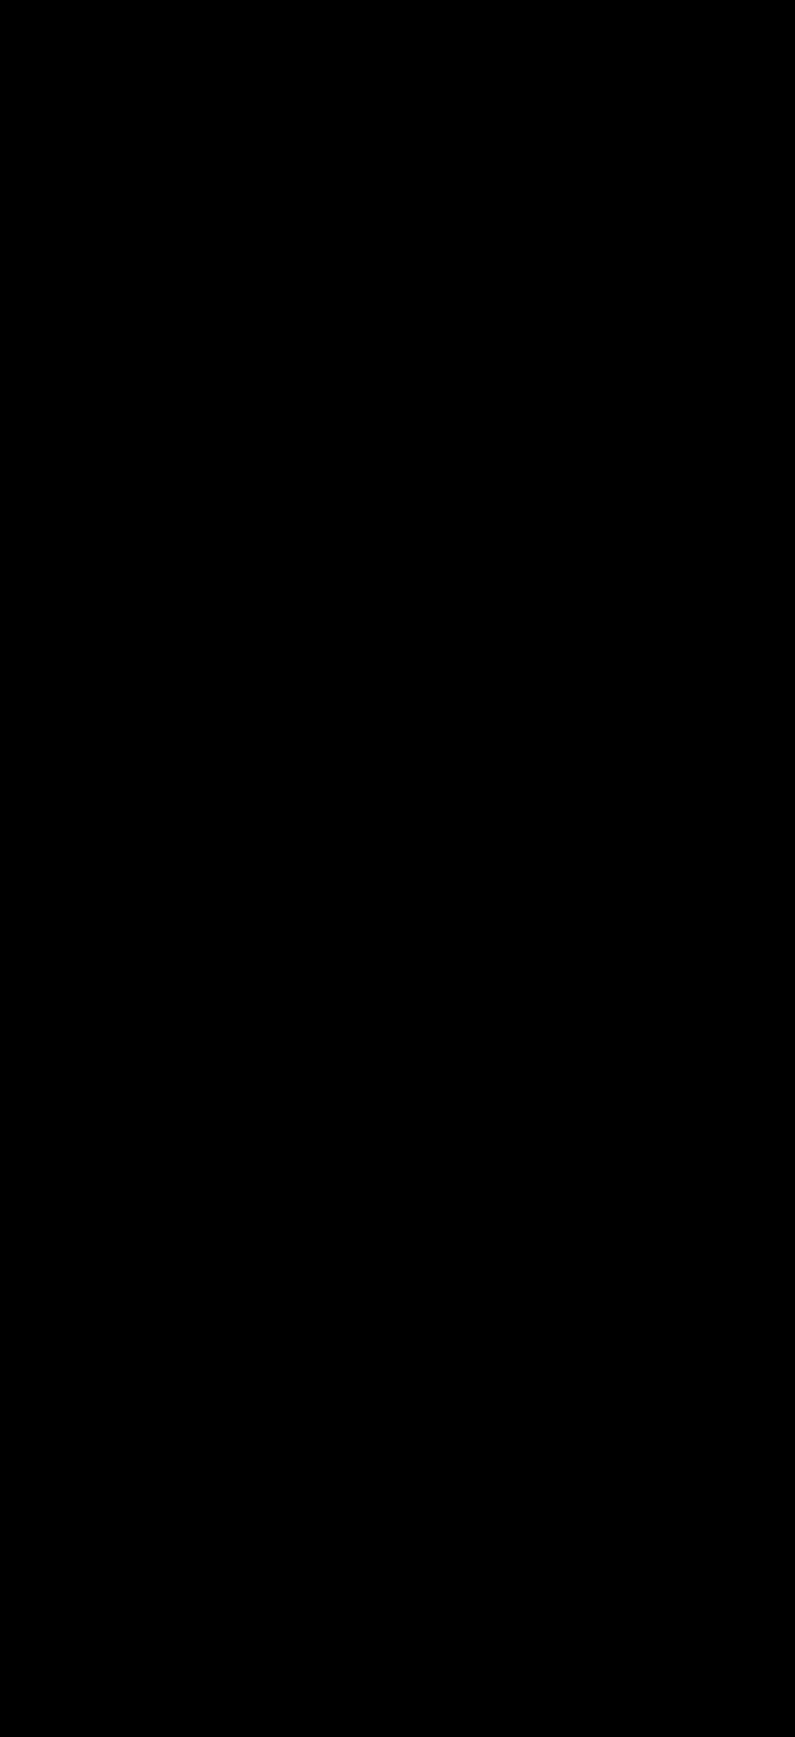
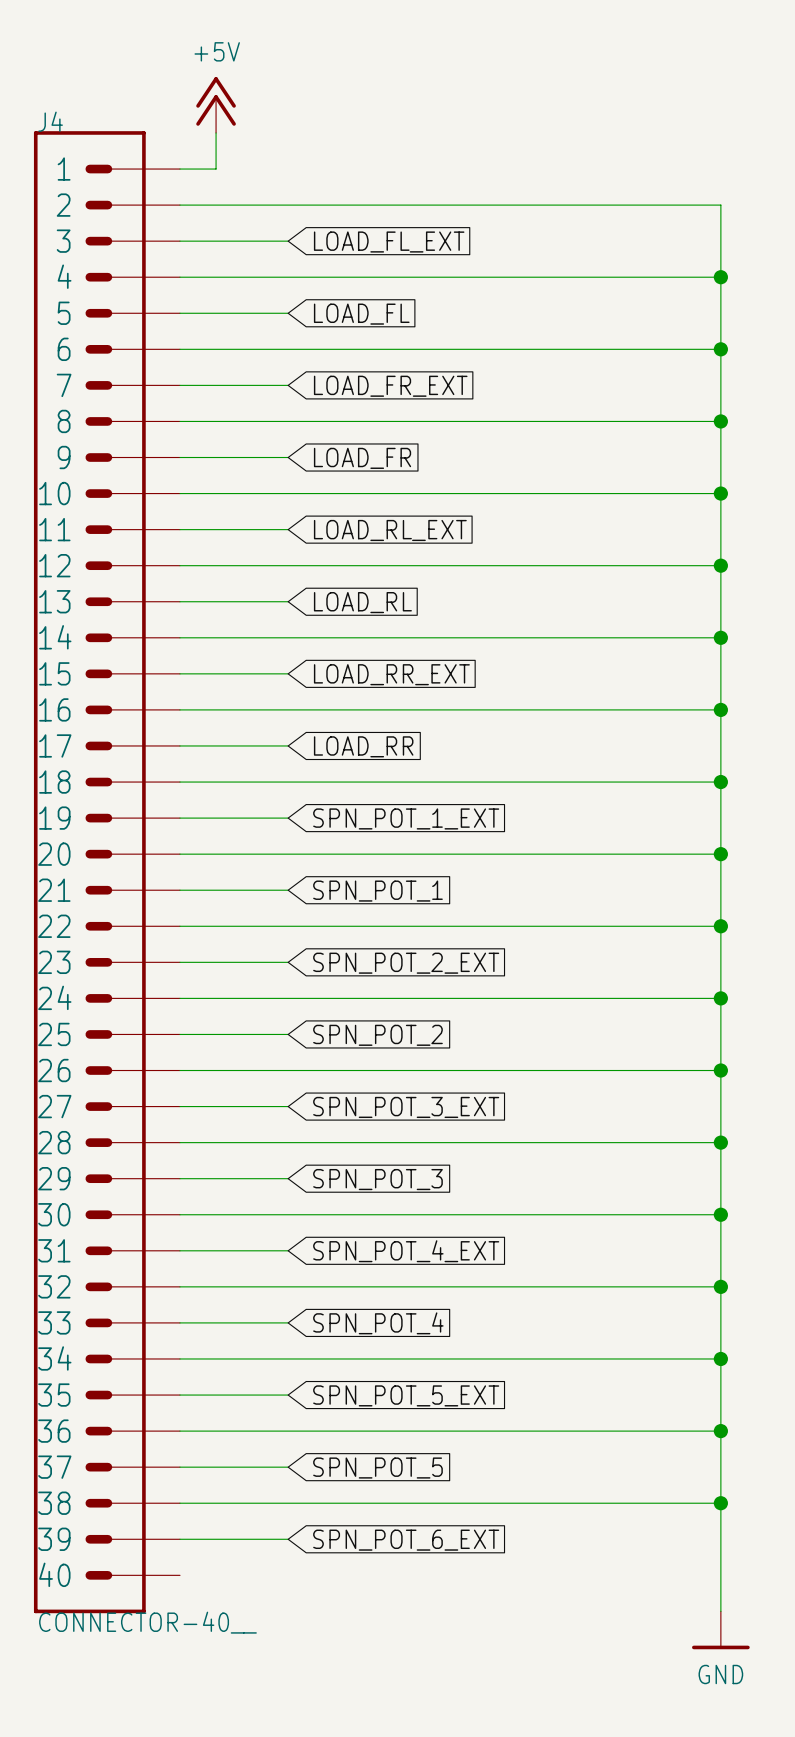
power symbol: none -> +5V (216, 105)
wire: none -> (216, 132) (216, 169) (179, 169)
wire: none -> (179, 205) (720, 205) (720, 1611)
wire: none -> (179, 241) (288, 241)
global label: none -> LOAD_FL_EXT (389, 242)
wire: none -> (179, 277) (720, 277)
junction: none -> (720, 277)
wire: none -> (179, 313) (288, 313)
global label: none -> LOAD_FL (361, 314)
wire: none -> (179, 349) (720, 349)
junction: none -> (720, 349)
wire: none -> (179, 385) (288, 385)
global label: none -> LOAD_FR_EXT (390, 386)
wire: none -> (179, 421) (720, 421)
junction: none -> (720, 421)
wire: none -> (179, 457) (288, 457)
global label: none -> LOAD_FR (362, 458)
wire: none -> (179, 493) (720, 493)
junction: none -> (720, 493)
wire: none -> (179, 529) (288, 529)
global label: none -> LOAD_RL_EXT (390, 530)
wire: none -> (179, 565) (720, 565)
junction: none -> (720, 565)
wire: none -> (179, 601) (288, 601)
global label: none -> LOAD_RL (362, 602)
wire: none -> (179, 637) (720, 637)
junction: none -> (720, 637)
wire: none -> (179, 673) (288, 673)
global label: none -> LOAD_RR_EXT (391, 674)
wire: none -> (179, 709) (720, 709)
junction: none -> (720, 709)
wire: none -> (179, 745) (288, 745)
global label: none -> LOAD_RR (363, 746)
wire: none -> (179, 782) (720, 782)
junction: none -> (720, 782)
wire: none -> (179, 818) (288, 818)
global label: none -> SPN_POT_1_EXT (406, 818)
wire: none -> (179, 854) (720, 854)
junction: none -> (720, 854)
J4: none -> CONNECTOR-40__ (106, 872)
wire: none -> (179, 890) (288, 890)
global label: none -> SPN_POT_1 (377, 891)
wire: none -> (179, 926) (720, 926)
junction: none -> (720, 926)
wire: none -> (179, 962) (288, 962)
global label: none -> SPN_POT_2_EXT (406, 963)
wire: none -> (179, 998) (720, 998)
junction: none -> (720, 998)
wire: none -> (179, 1034) (288, 1034)
global label: none -> SPN_POT_2 (377, 1035)
wire: none -> (179, 1070) (720, 1070)
junction: none -> (720, 1070)
wire: none -> (179, 1106) (288, 1106)
global label: none -> SPN_POT_3_EXT (406, 1107)
wire: none -> (179, 1142) (720, 1142)
junction: none -> (720, 1142)
wire: none -> (179, 1178) (288, 1178)
global label: none -> SPN_POT_3 (377, 1179)
wire: none -> (179, 1214) (720, 1214)
junction: none -> (720, 1214)
wire: none -> (179, 1250) (288, 1250)
global label: none -> SPN_POT_4_EXT (406, 1251)
wire: none -> (179, 1286) (720, 1286)
junction: none -> (720, 1286)
wire: none -> (179, 1322) (288, 1322)
global label: none -> SPN_POT_4 (378, 1323)
wire: none -> (179, 1358) (720, 1358)
junction: none -> (720, 1358)
wire: none -> (179, 1395) (288, 1395)
global label: none -> SPN_POT_5_EXT (406, 1395)
wire: none -> (179, 1431) (720, 1431)
junction: none -> (720, 1431)
wire: none -> (179, 1467) (288, 1467)
global label: none -> SPN_POT_5 (377, 1468)
wire: none -> (179, 1503) (720, 1503)
junction: none -> (720, 1503)
wire: none -> (179, 1539) (288, 1539)
global label: none -> SPN_POT_6_EXT (406, 1540)
power symbol: none -> GND (720, 1630)

